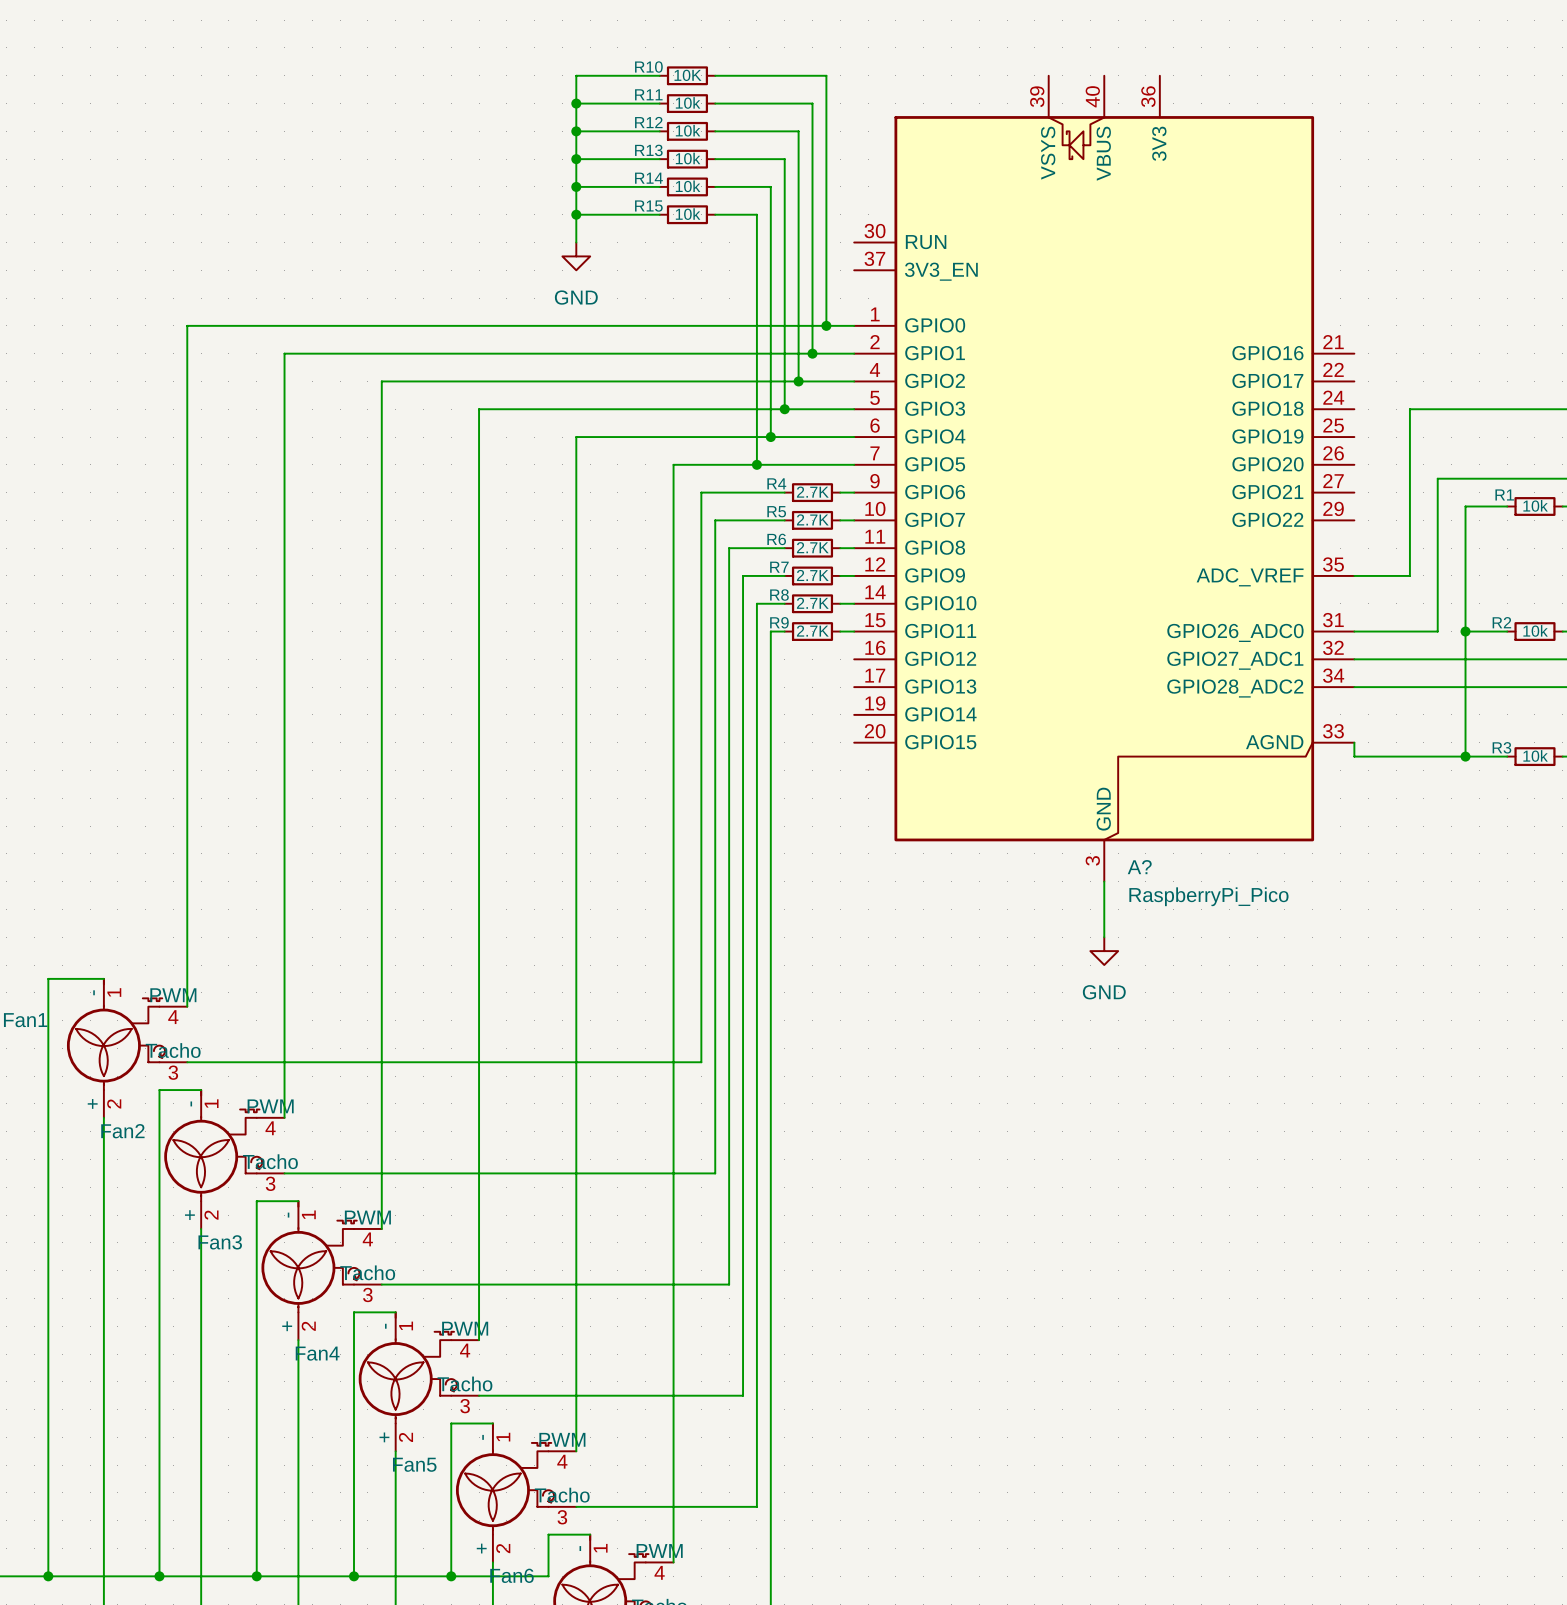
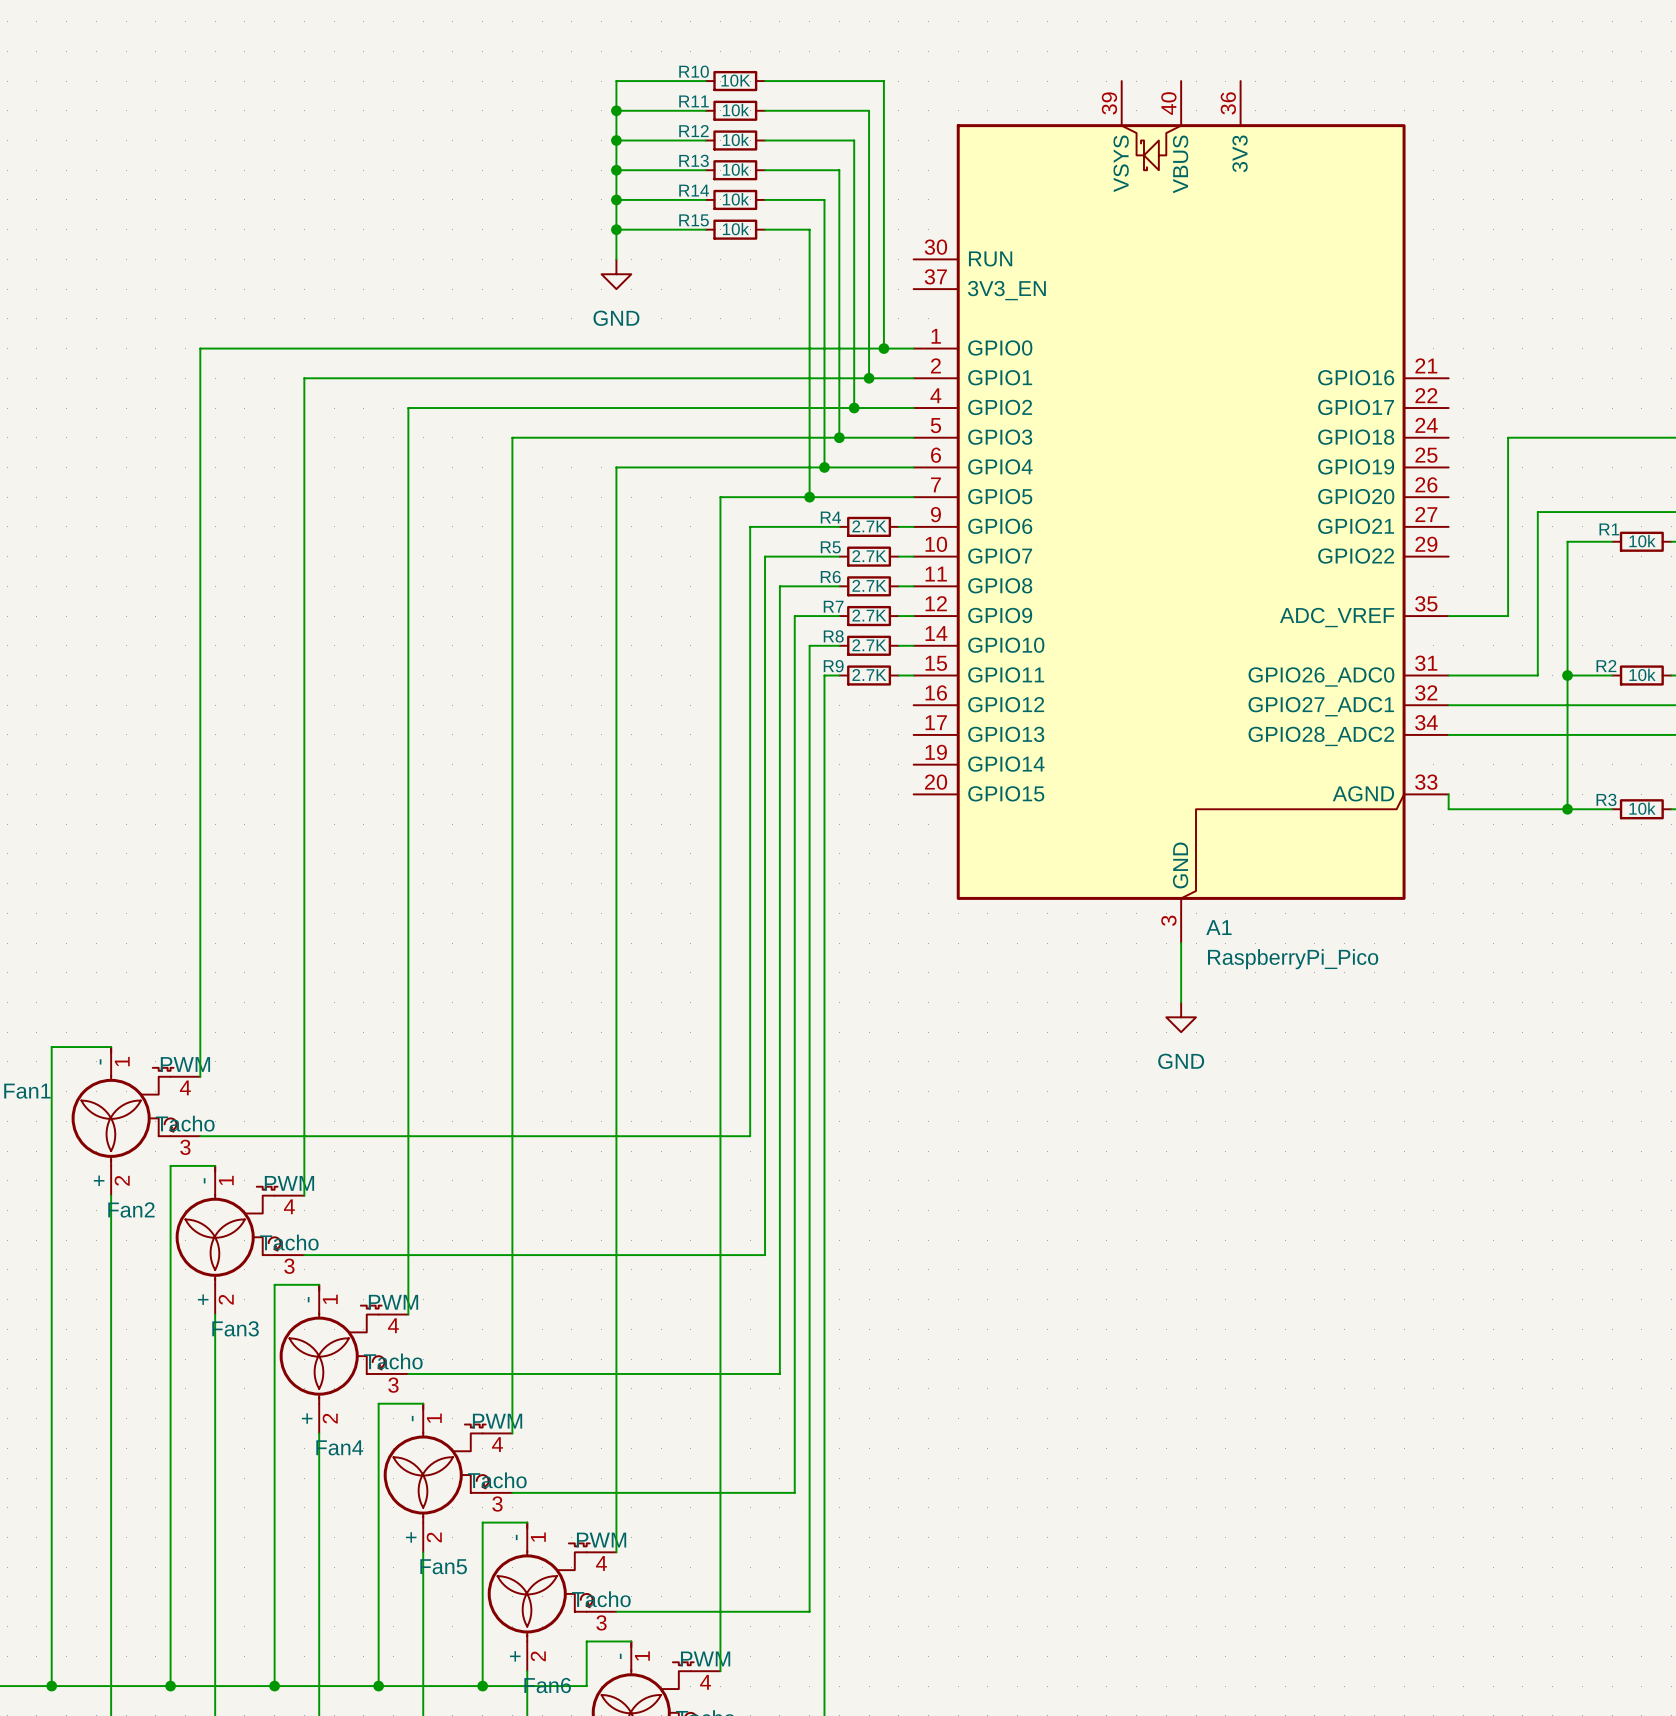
A? name: A? (1139, 867) -> A1 (1218, 927)

